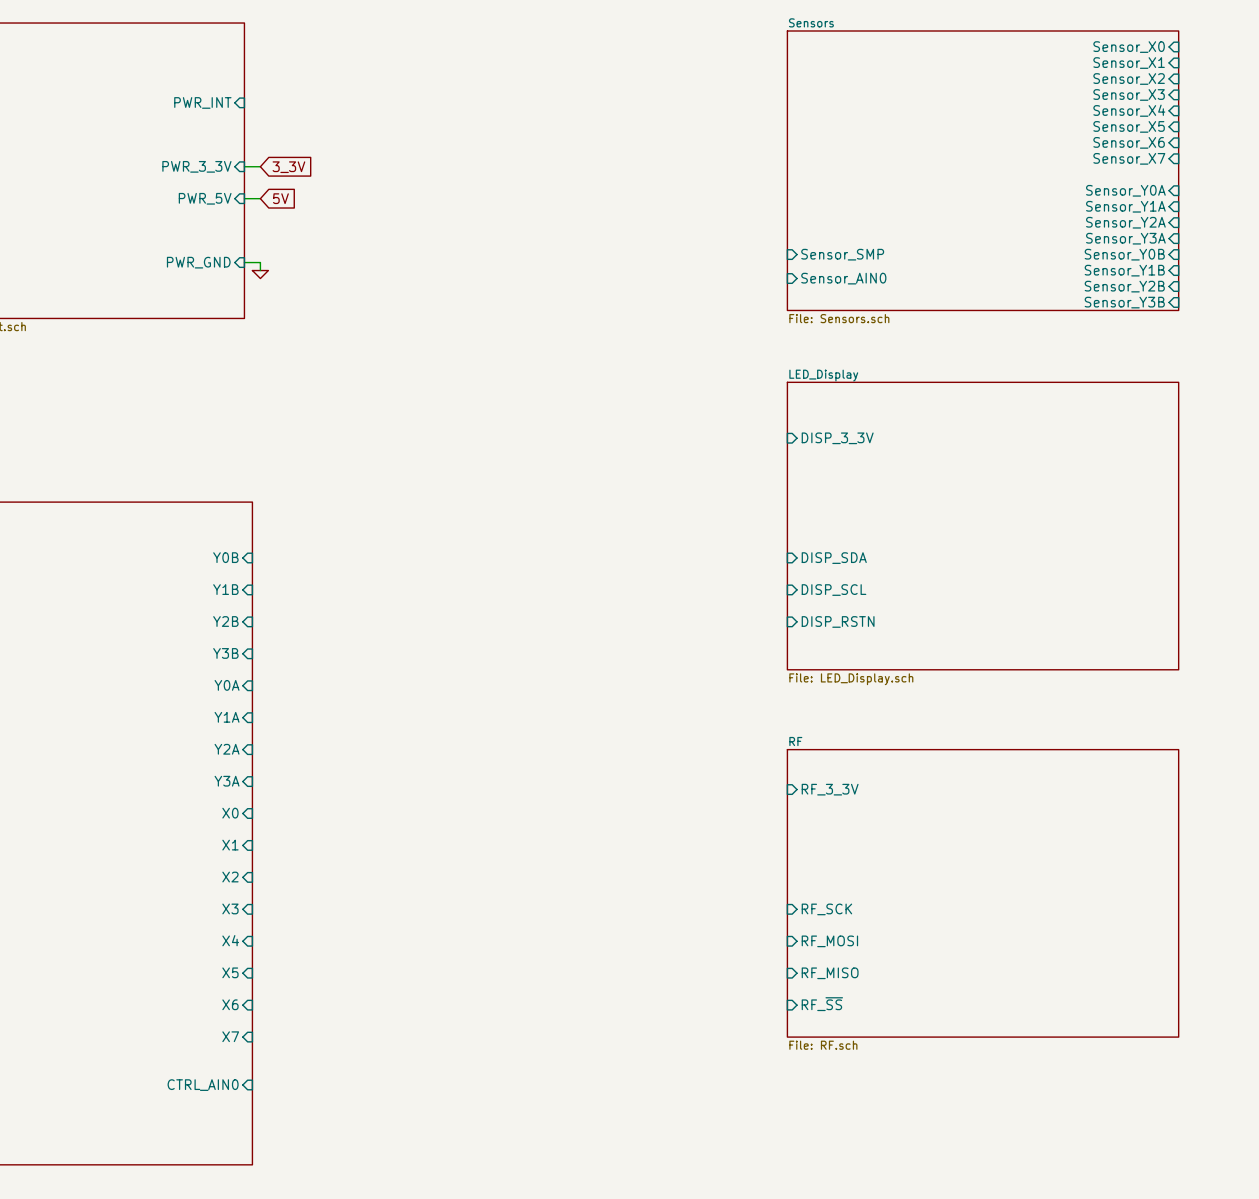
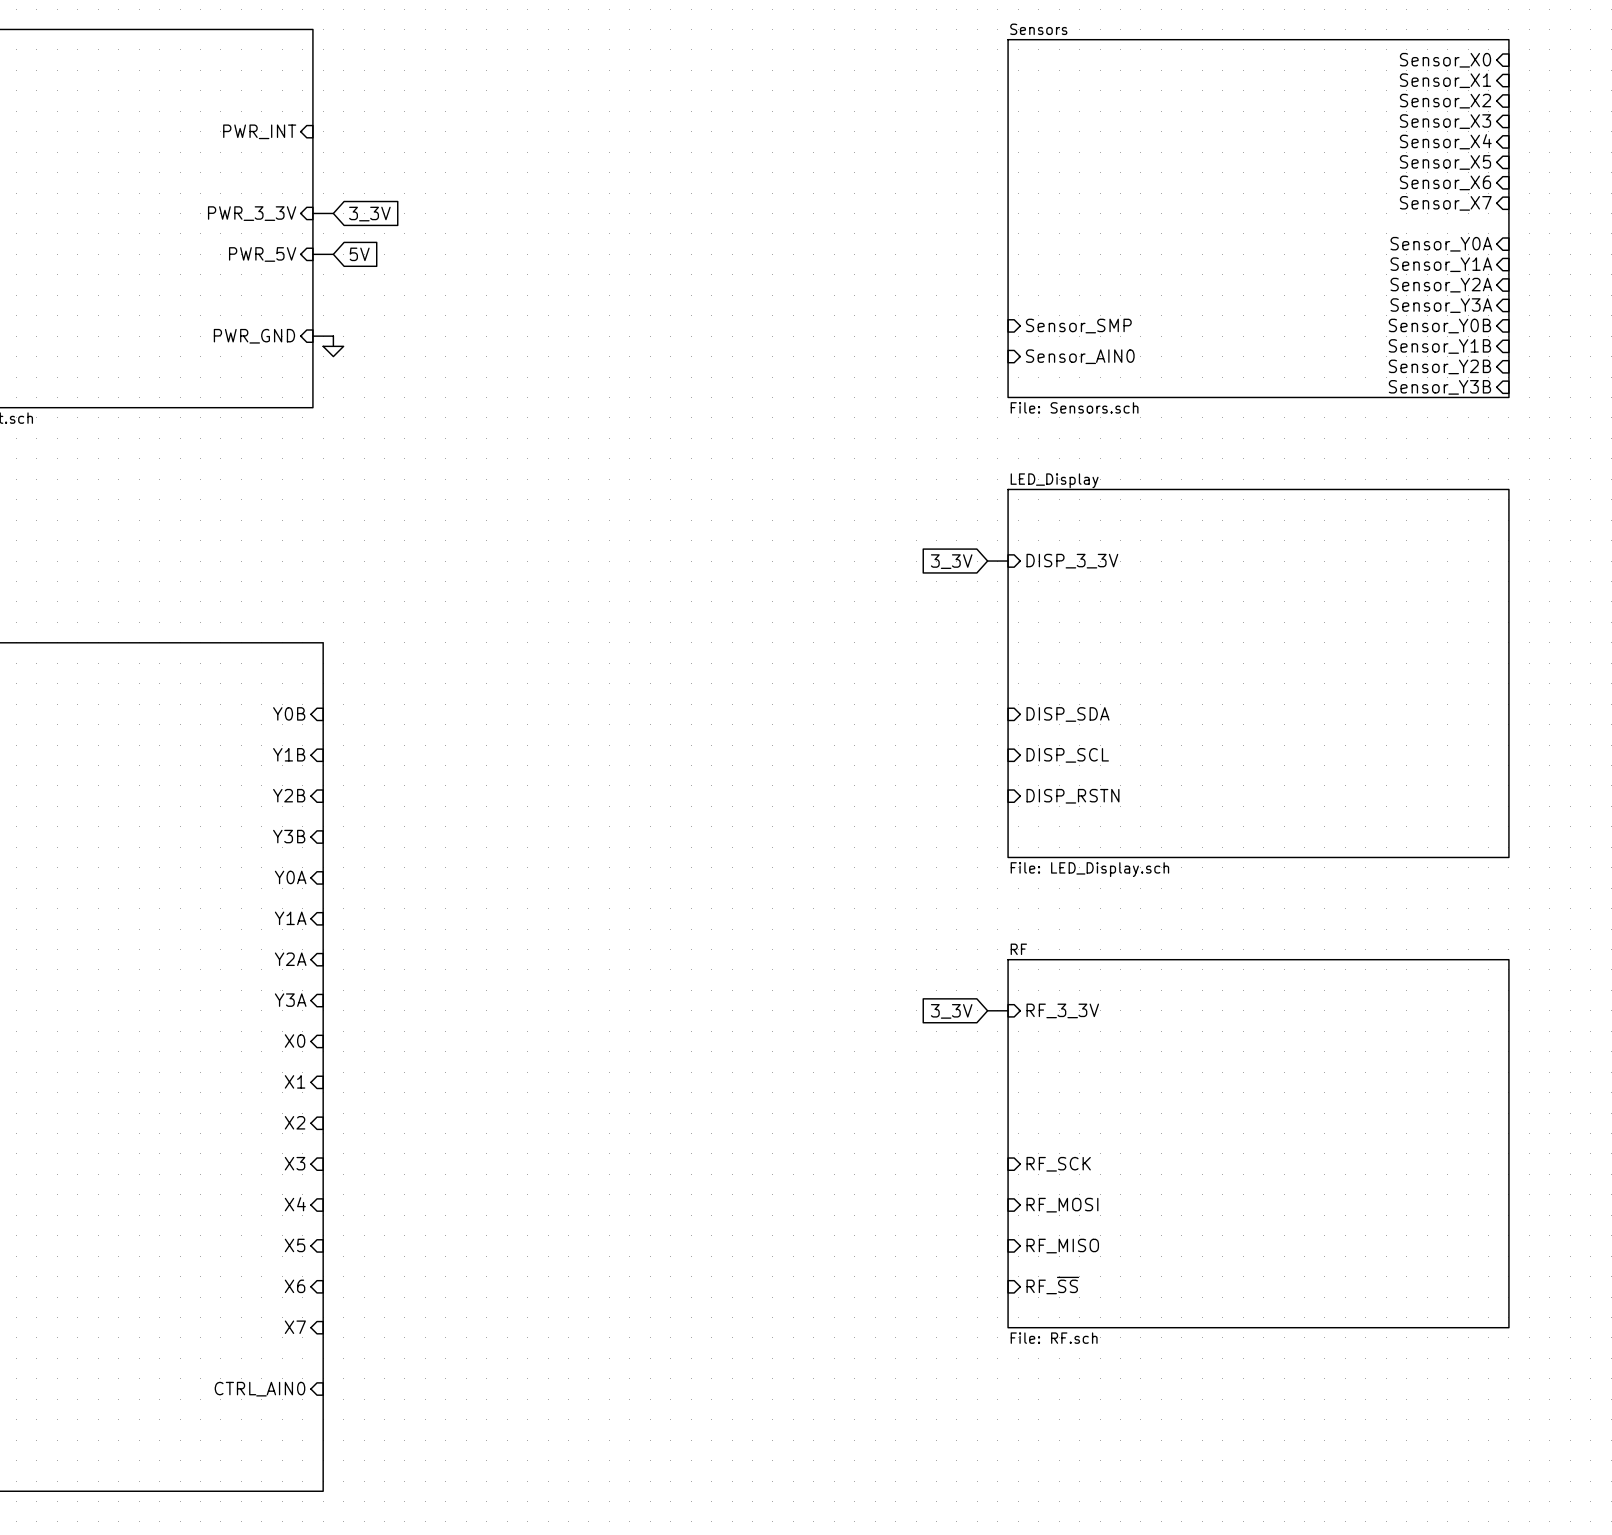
global label: none -> 3_3V (951, 561)
wire: none -> (987, 561) (1008, 561)
wire: none -> (987, 1010) (1008, 1010)
global label: none -> 3_3V (951, 1011)

